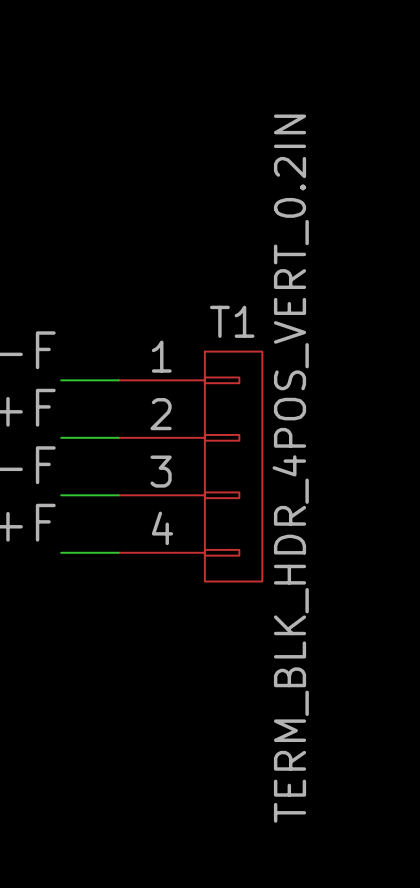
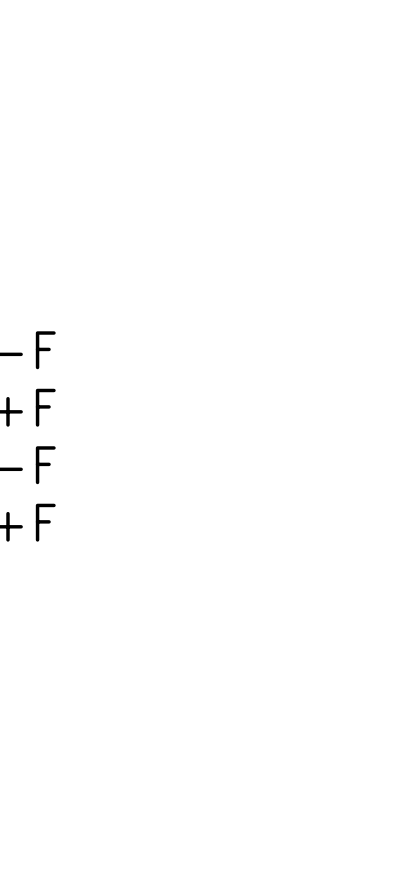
wire: (61, 380) (118, 380) -> none
wire: (61, 437) (118, 437) -> none
T1: TERM_BLK_HDR_4POS_VERT_0.2IN (190, 466) -> none
wire: (61, 495) (118, 495) -> none
wire: (61, 552) (118, 552) -> none

